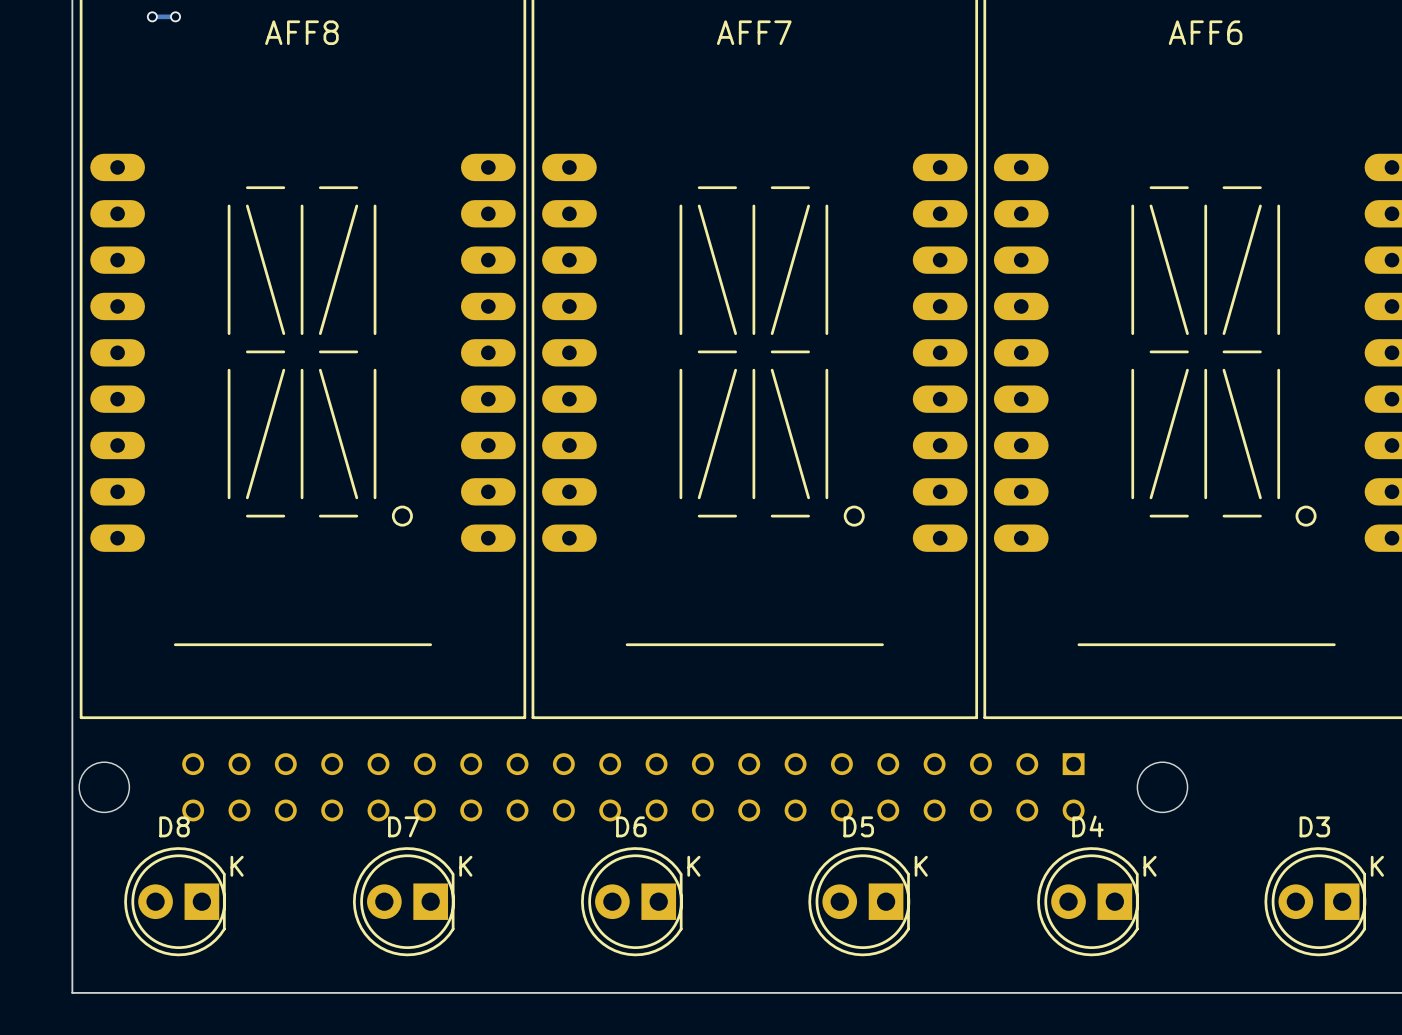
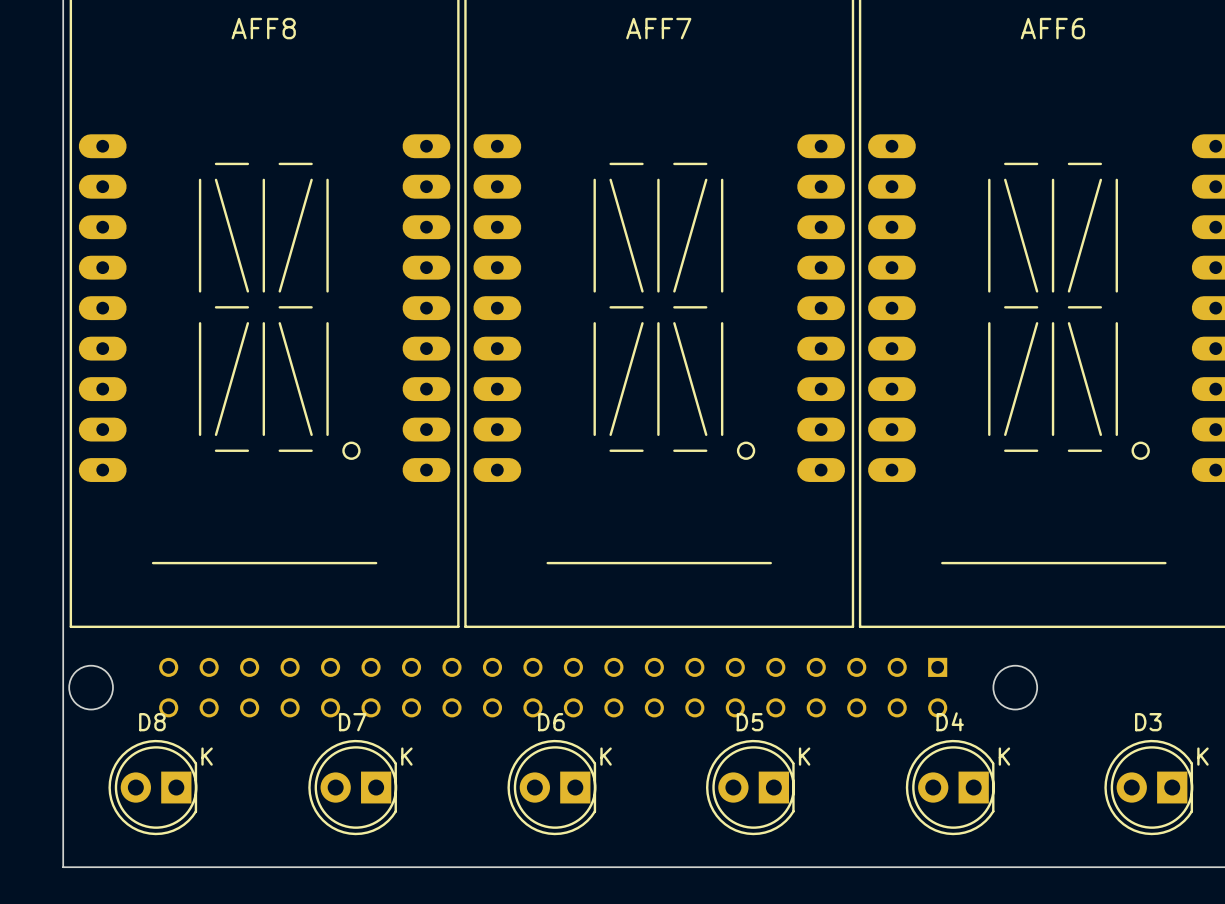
via: (152, 16) -> none
track: (175, 16) (152, 16) -> none
via: (175, 16) -> none

